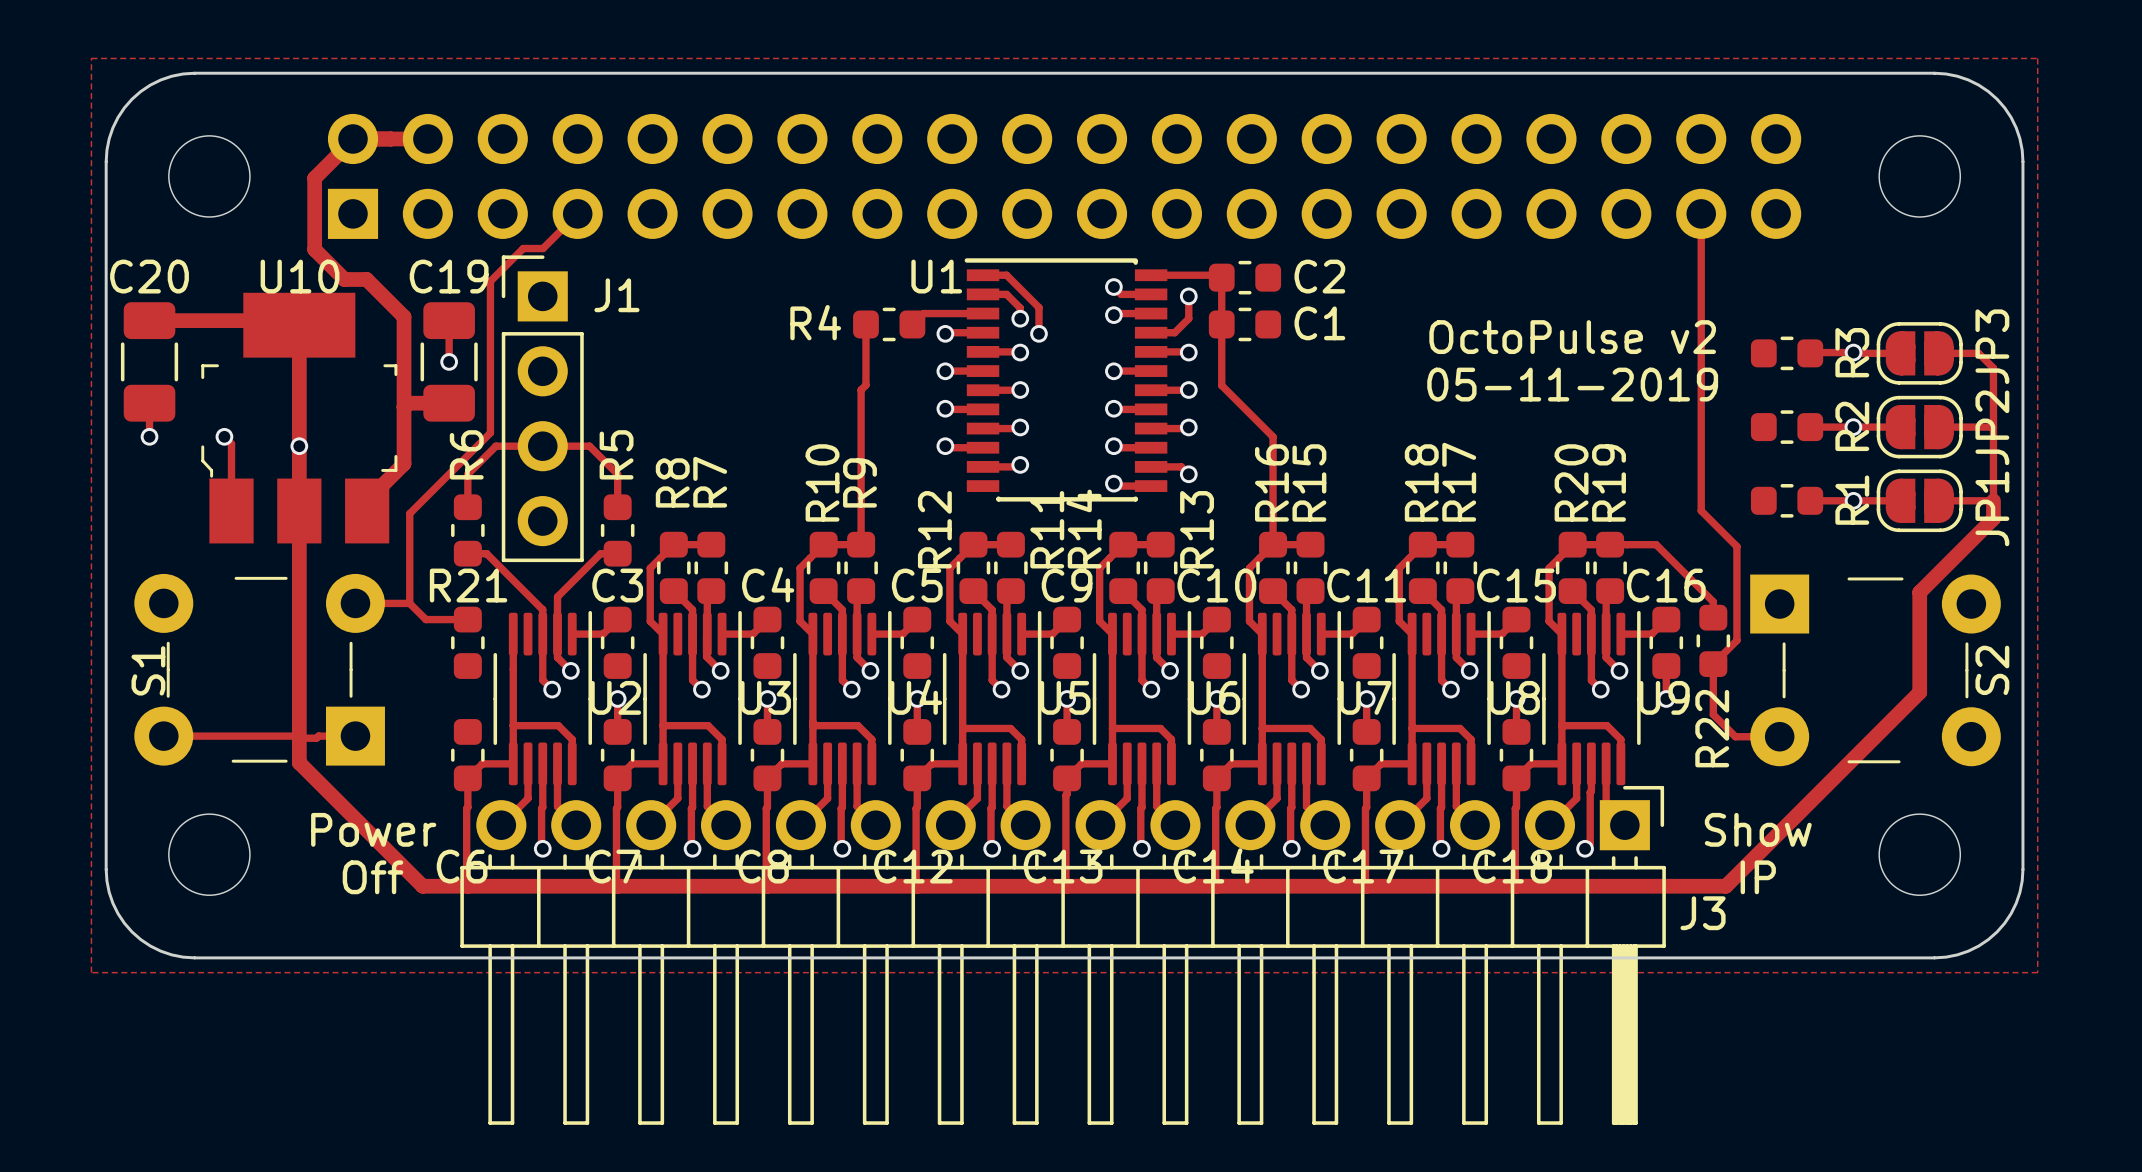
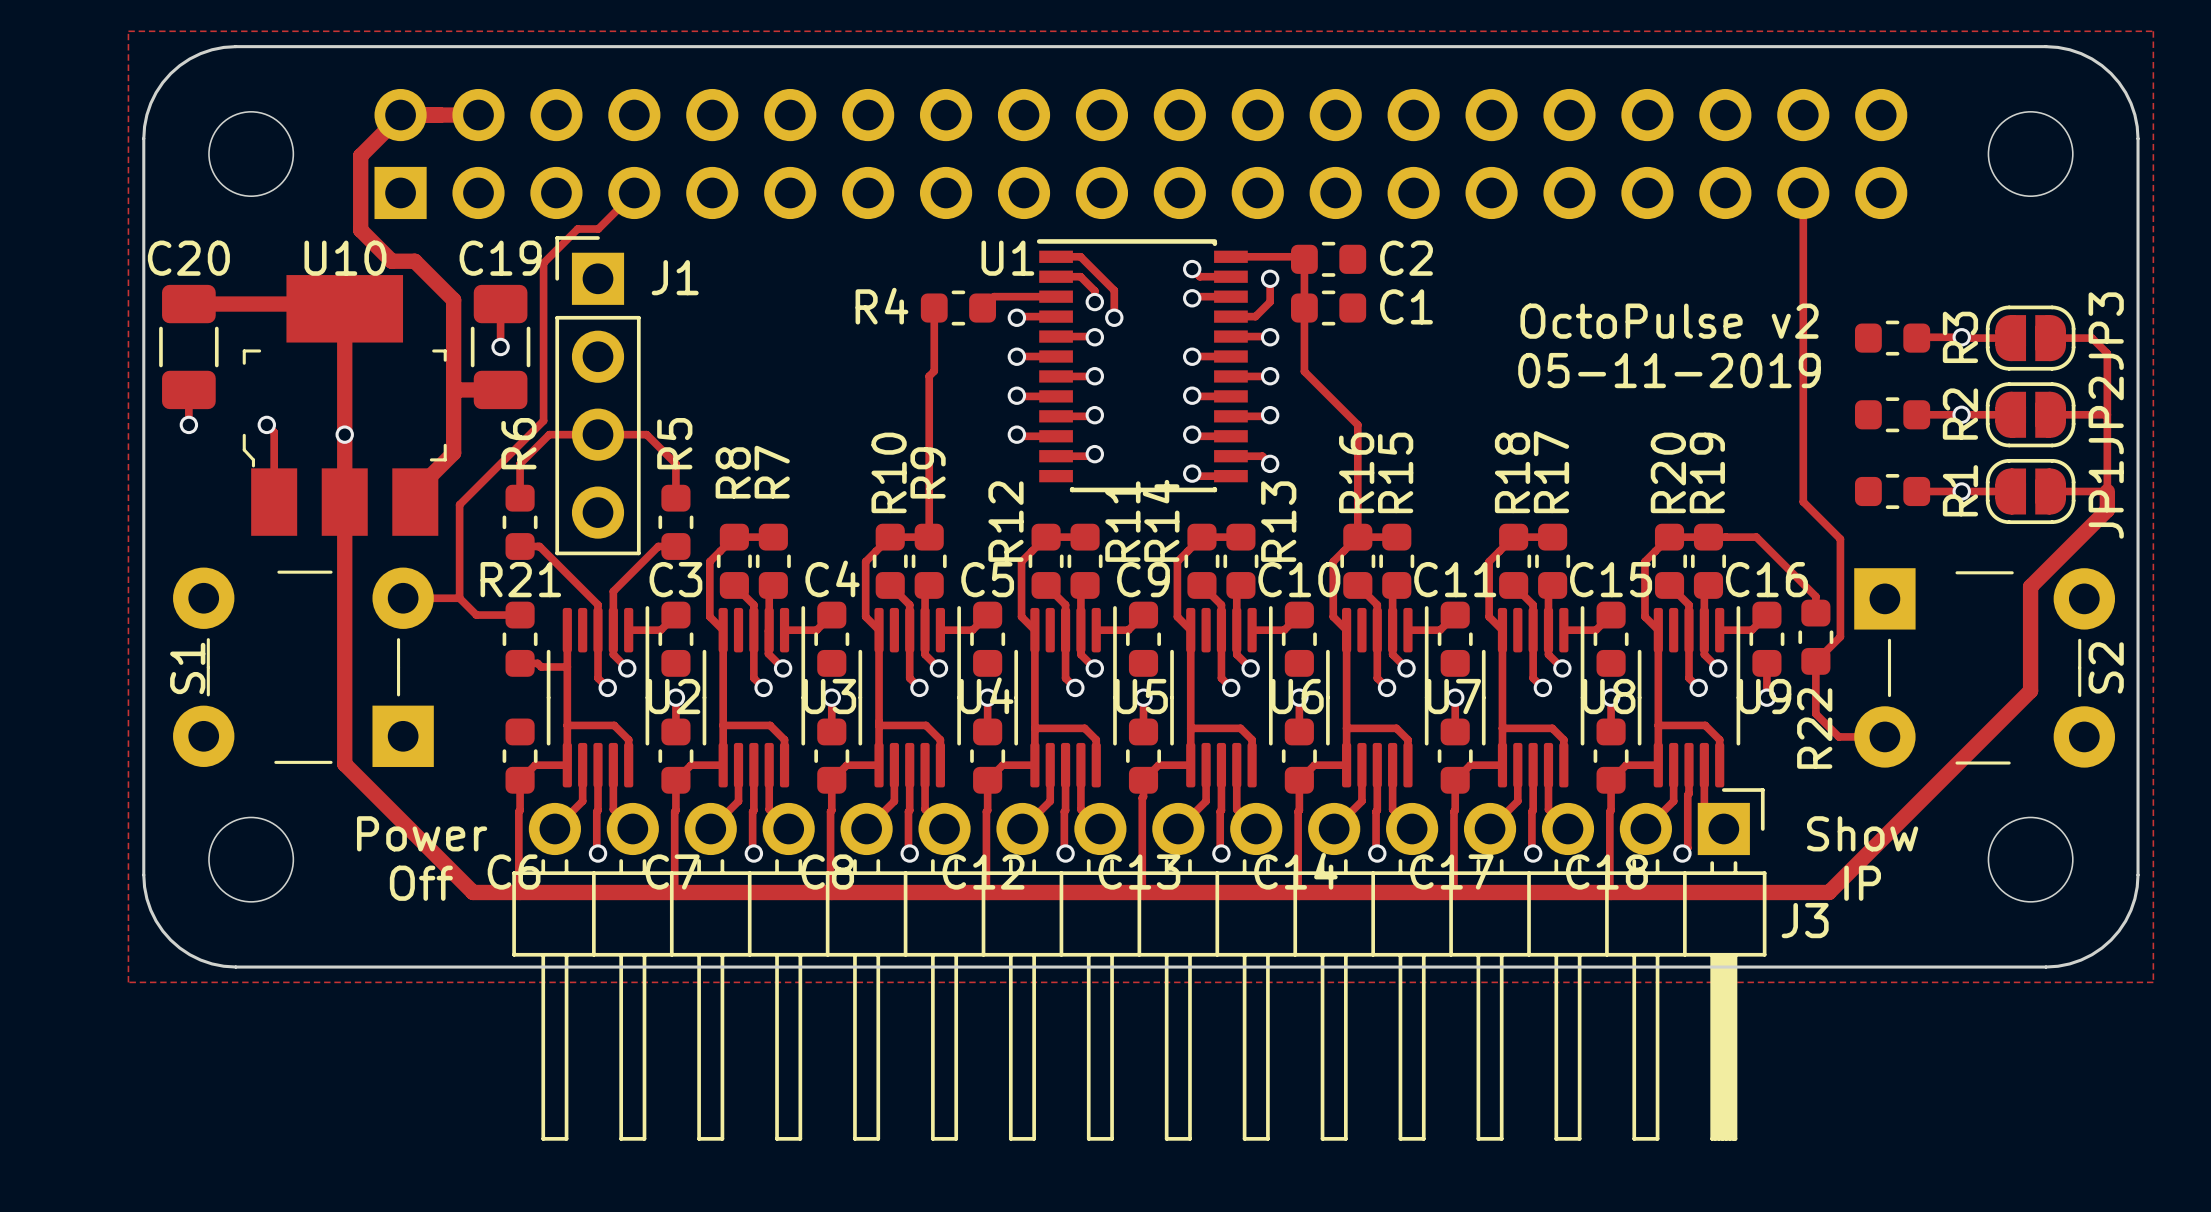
track: none -> (520, 663) (537, 663) (541, 666) (567, 666)
track: (163, 736) (297, 736) (299, 738) (355, 736) -> none

